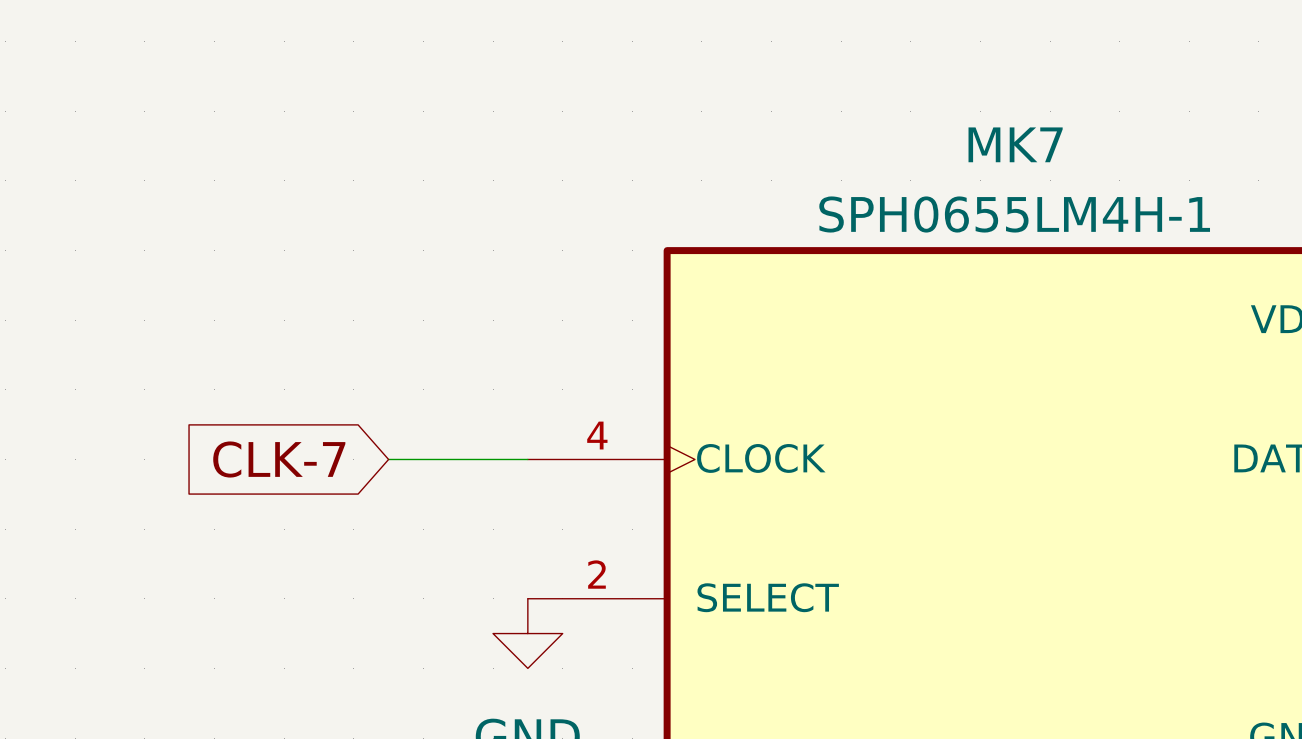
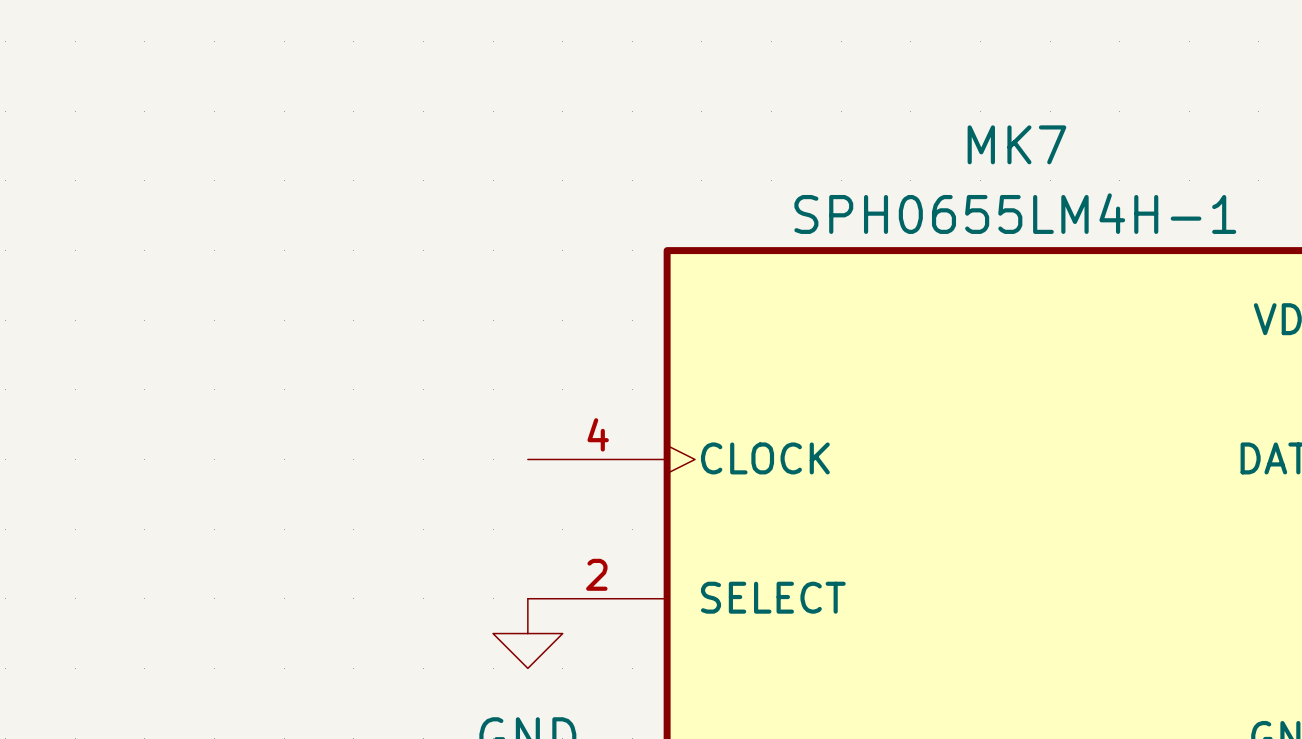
global label: CLK-7 (279, 459) -> none
wire: (388, 459) (527, 459) -> none

